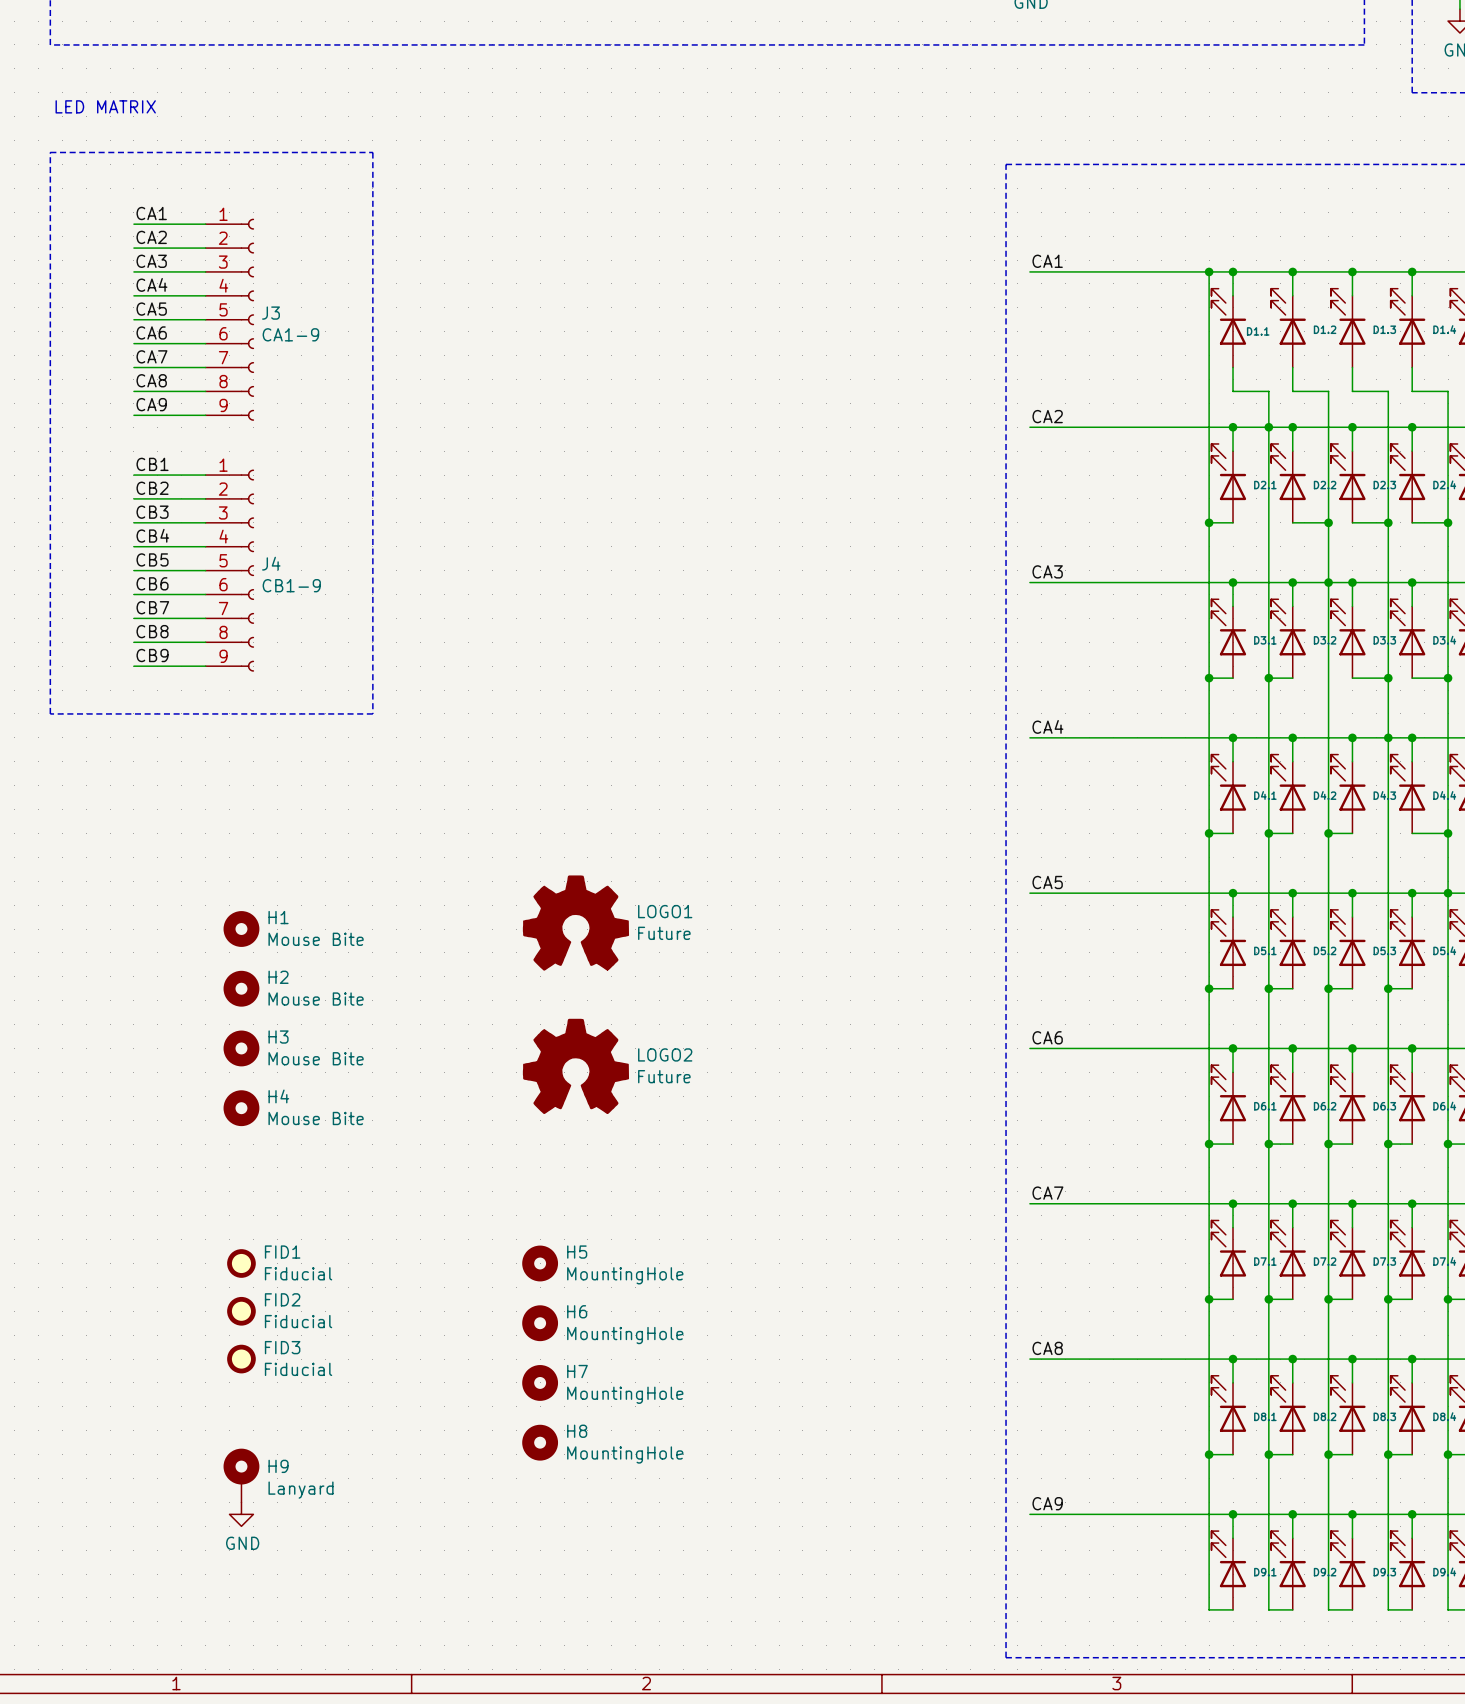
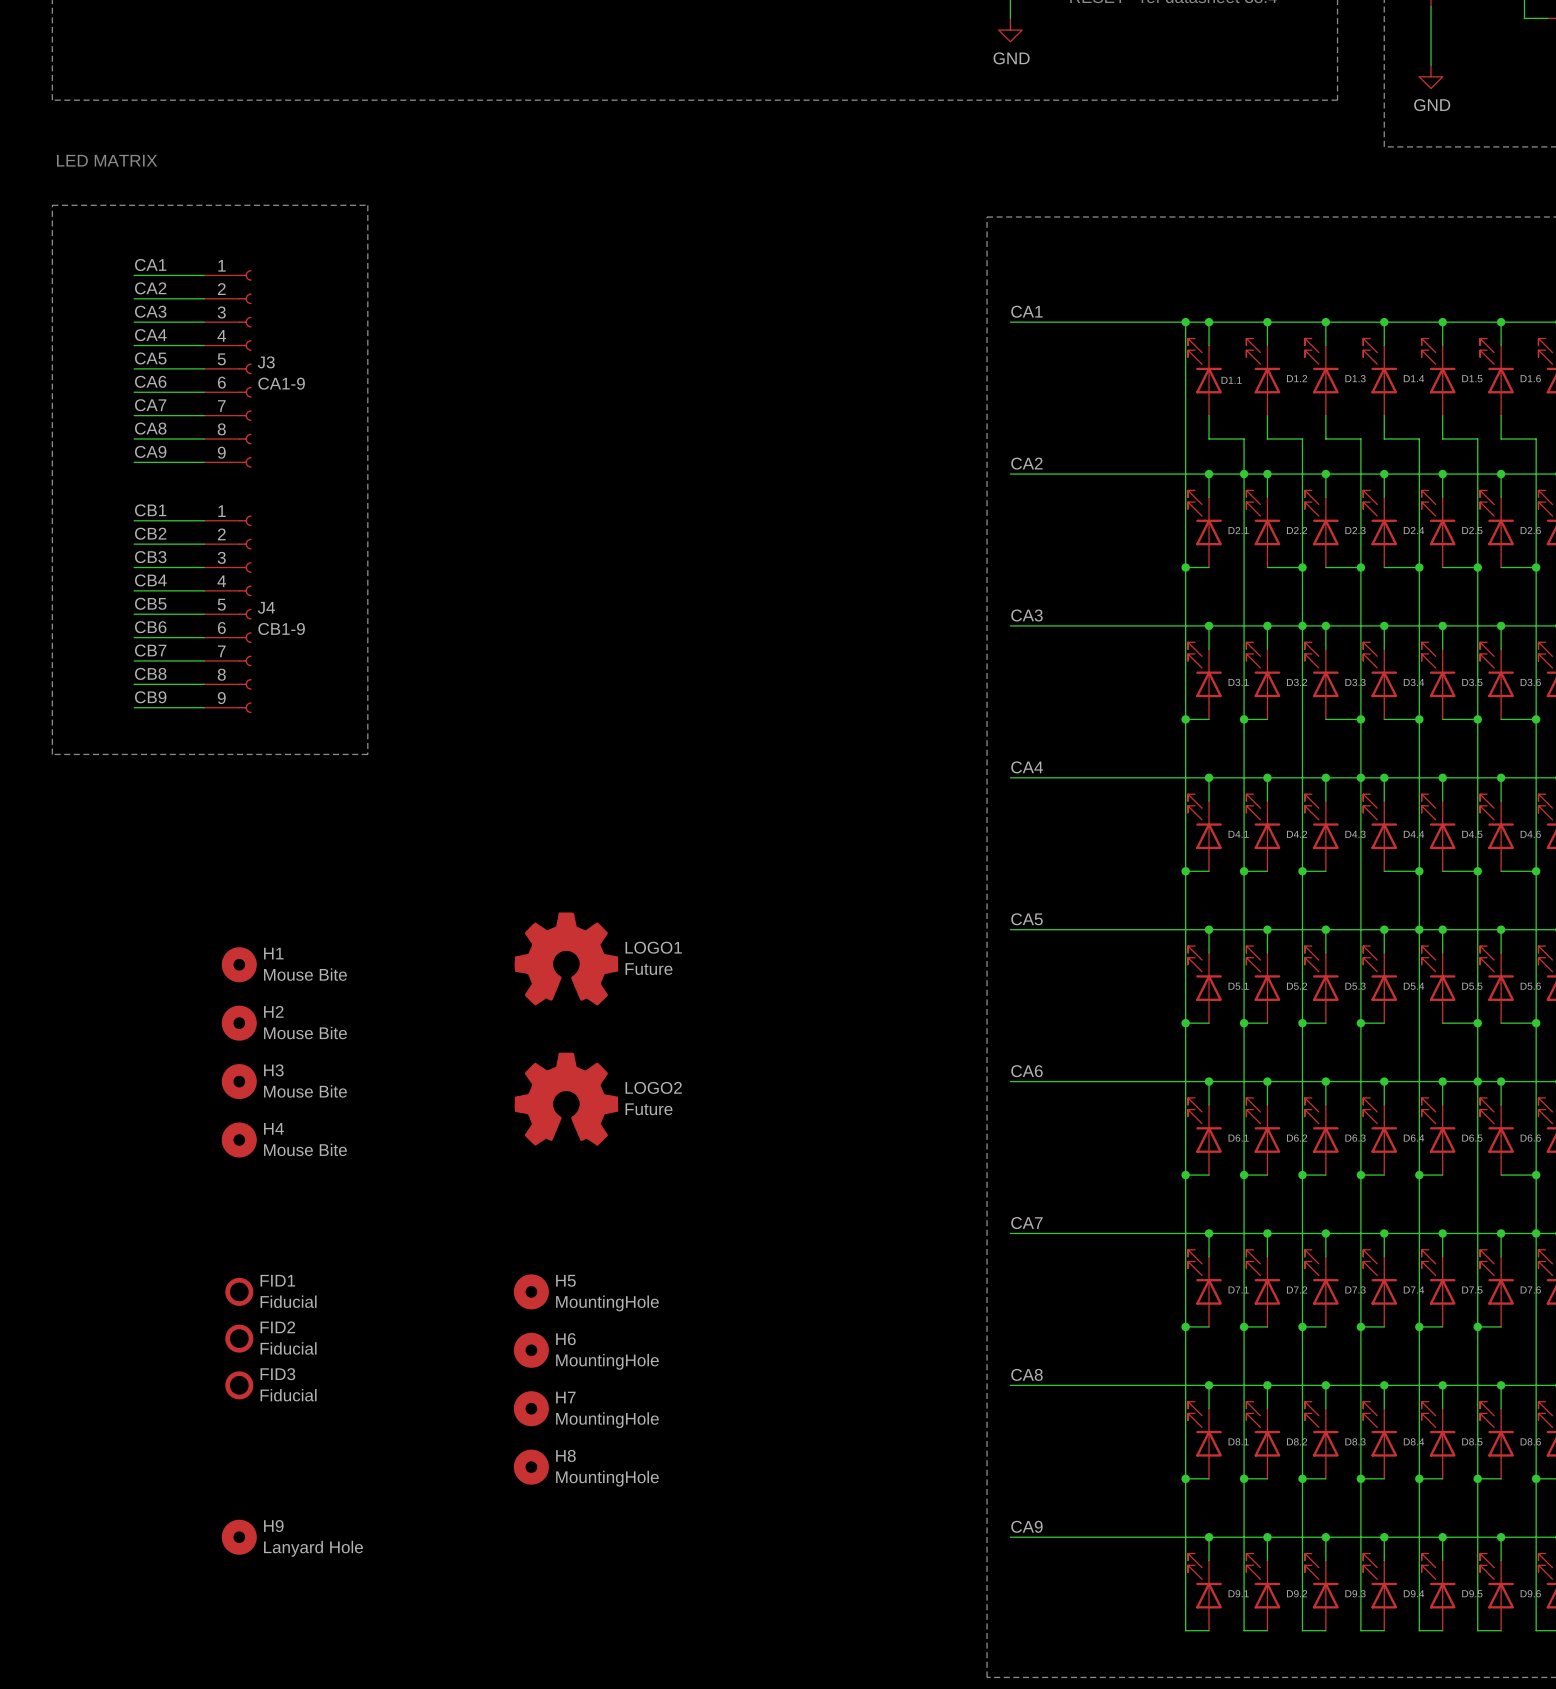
H9 symbol: [223, 1448, 260, 1503] -> [221, 1519, 257, 1555]
H9 value: Lanyard (301, 1490) -> Lanyard Hole (313, 1548)
power symbol: GND (241, 1514) -> none

